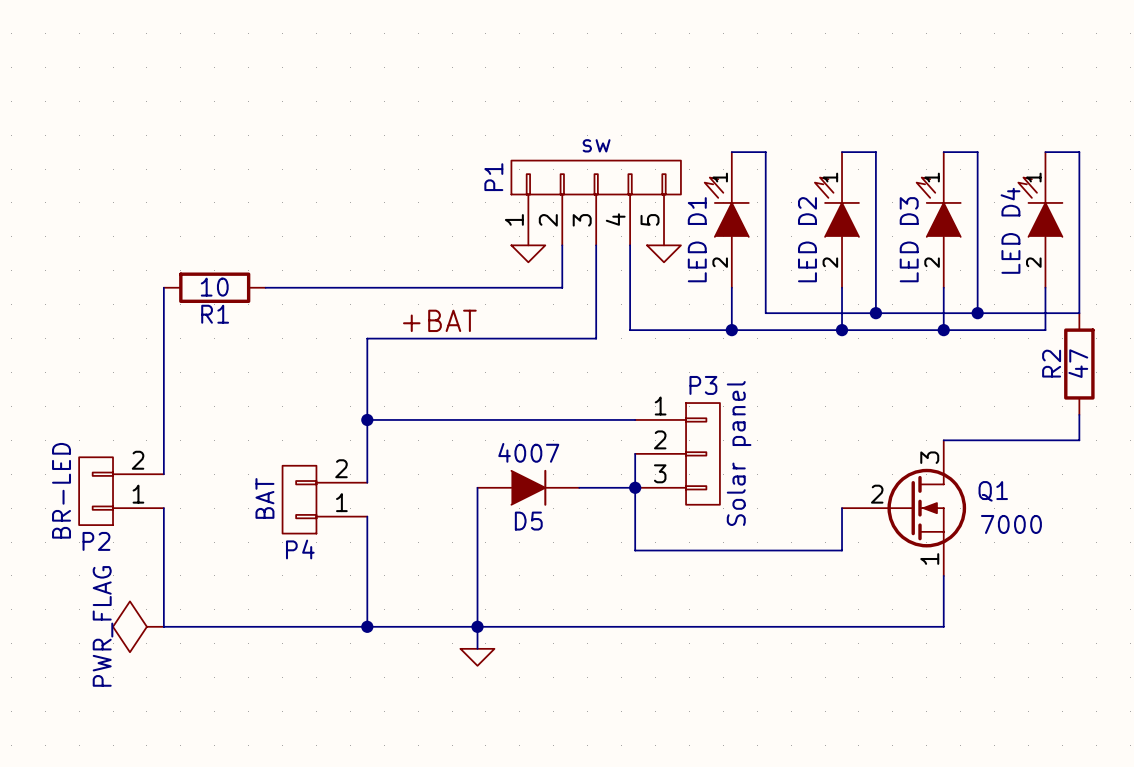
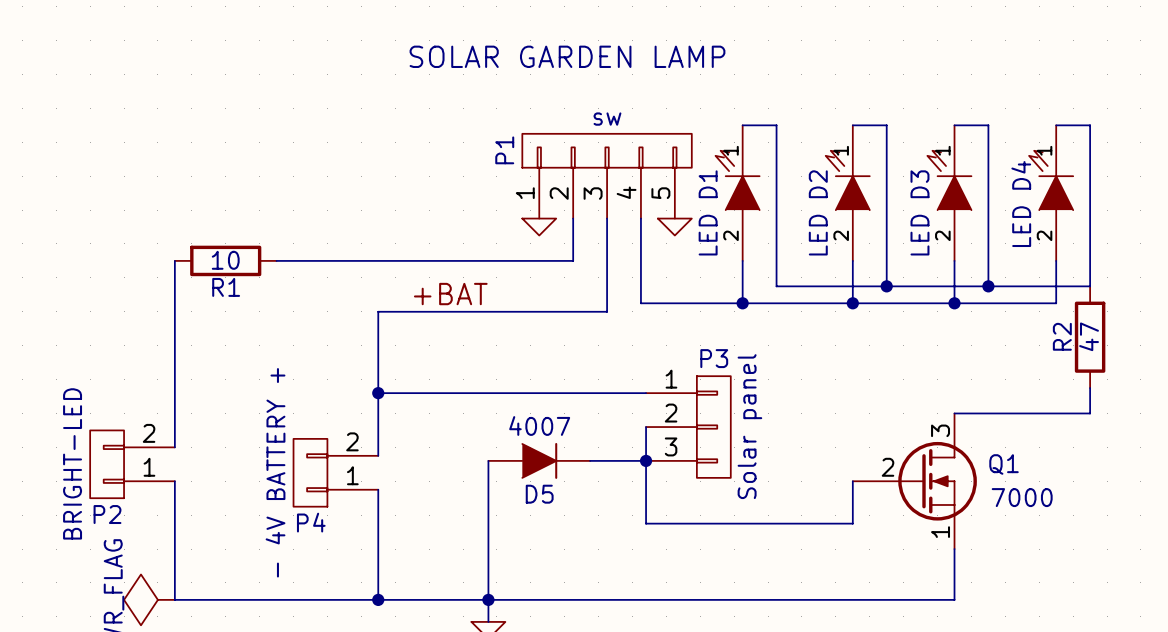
text: none -> SOLAR GARDEN LAMP (567, 56)
P2 value: BR-LED (61, 490) -> BRIGHT-LED (72, 463)
P4 value: BAT (264, 498) -> - 4V BATTERY + (275, 472)

